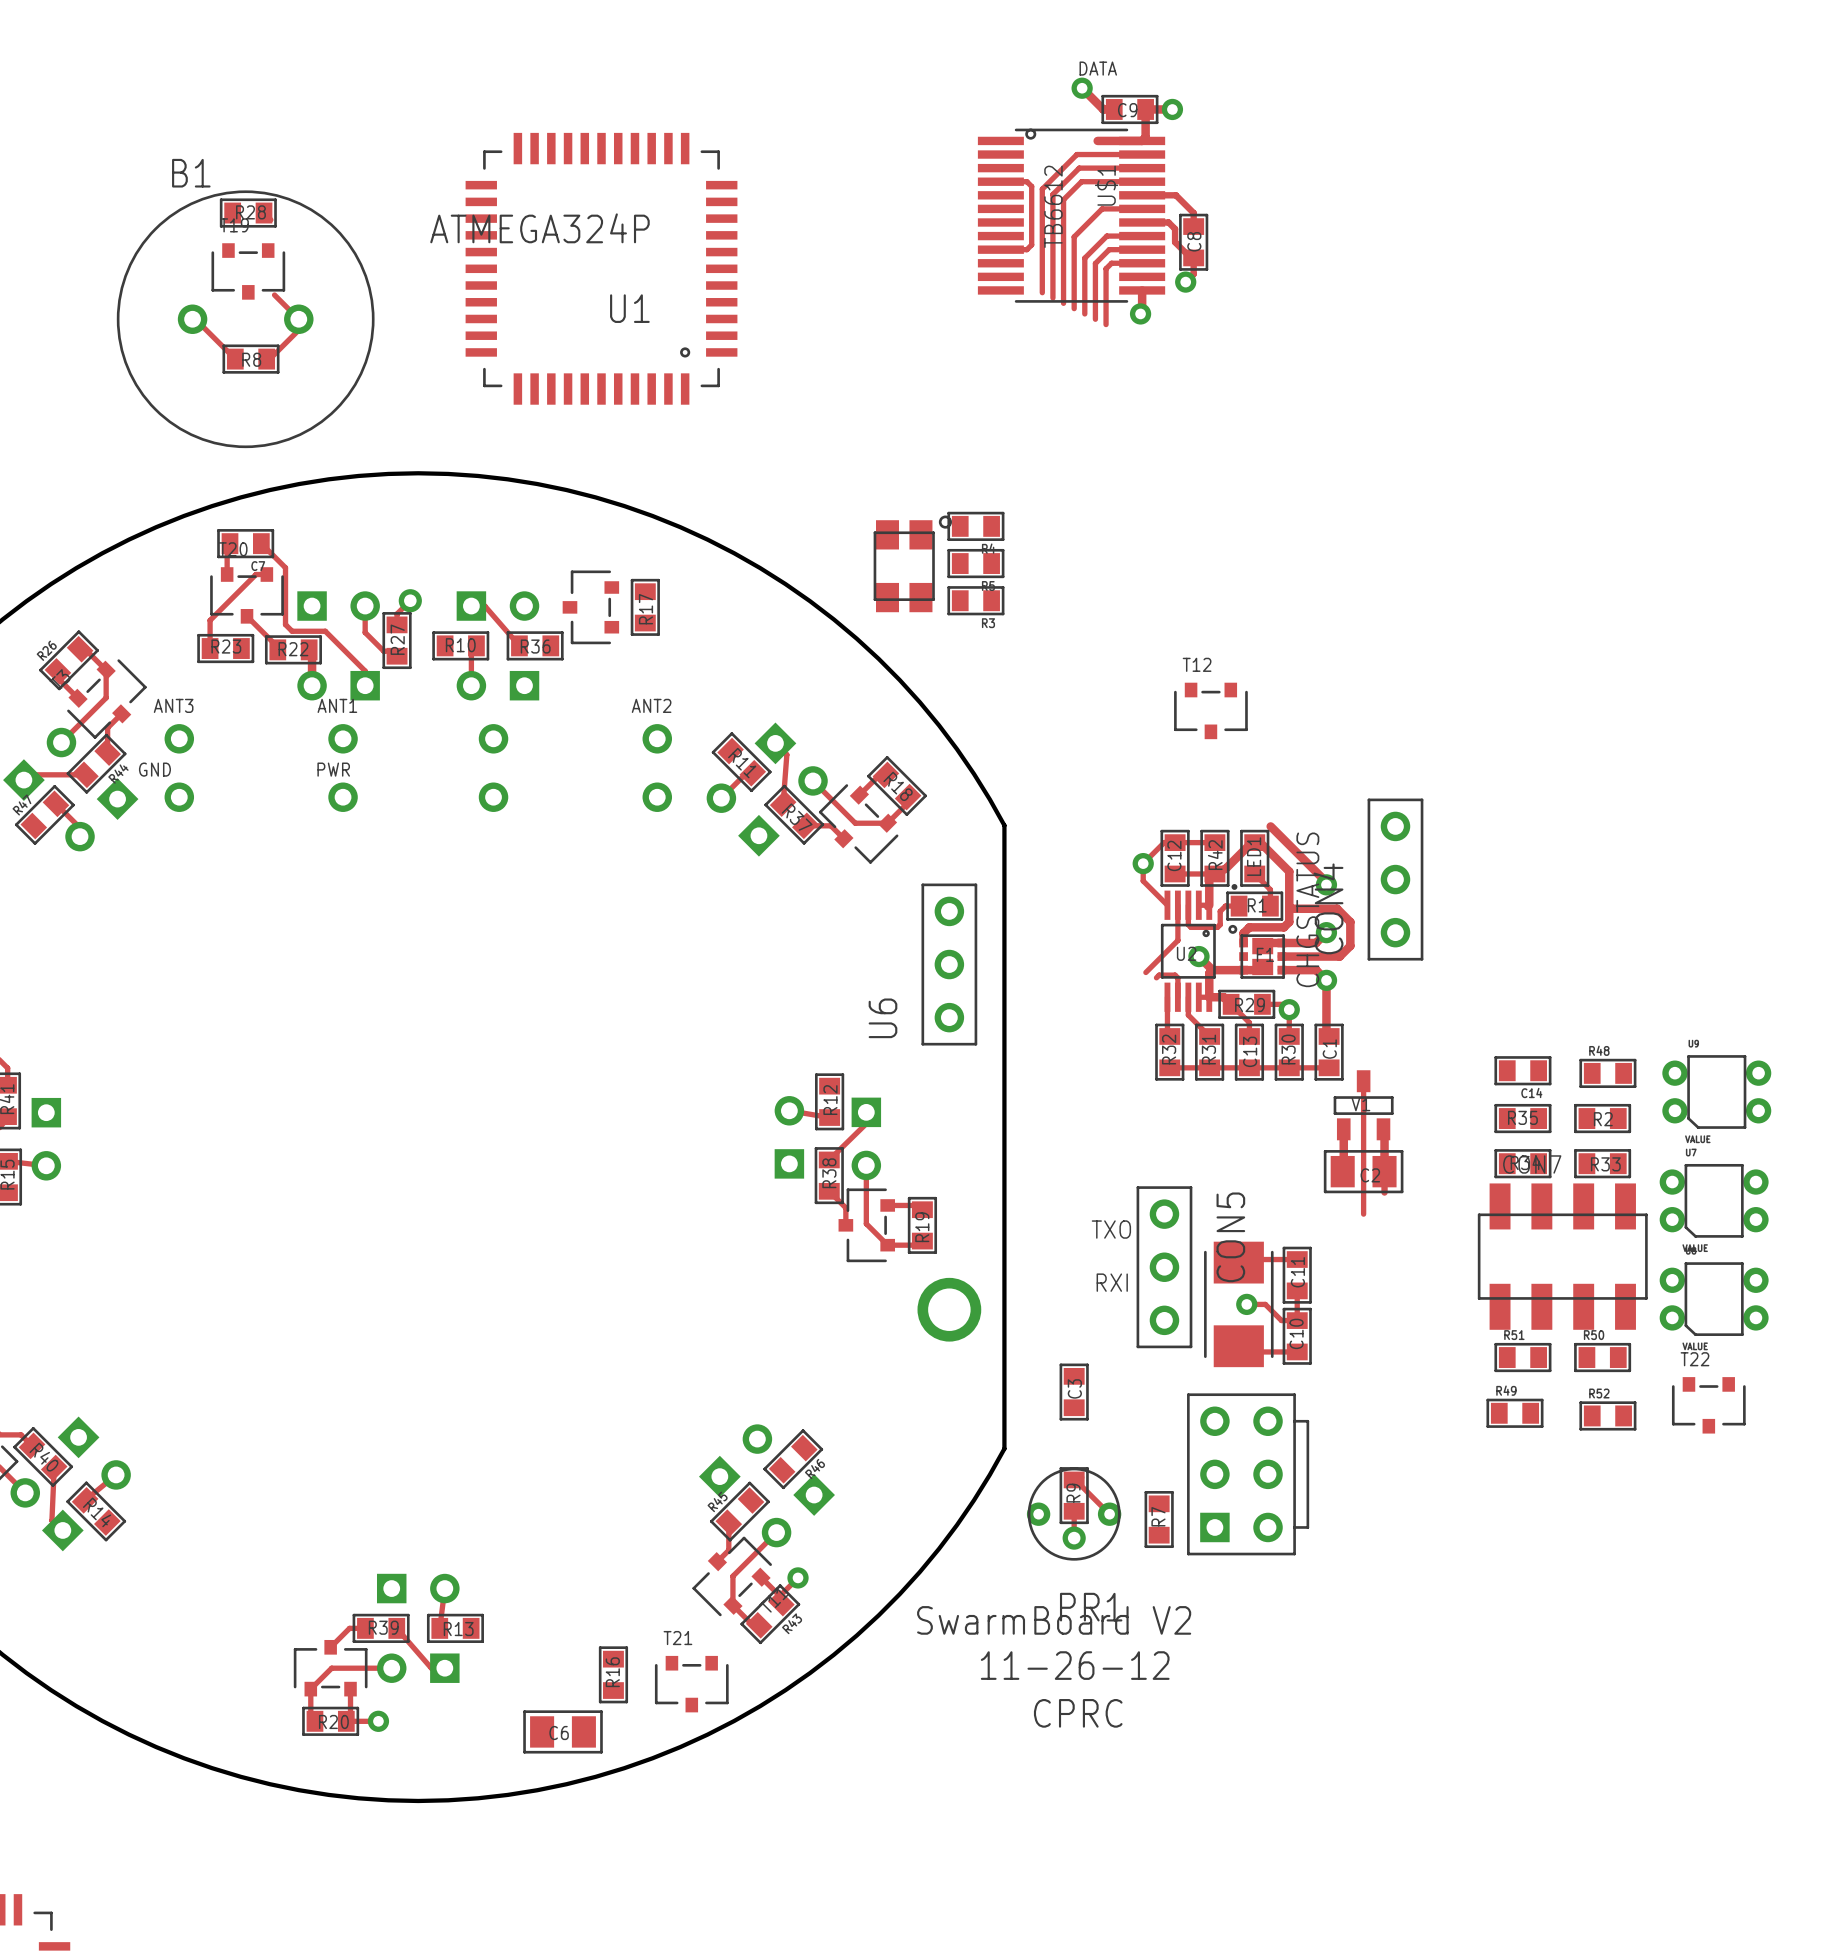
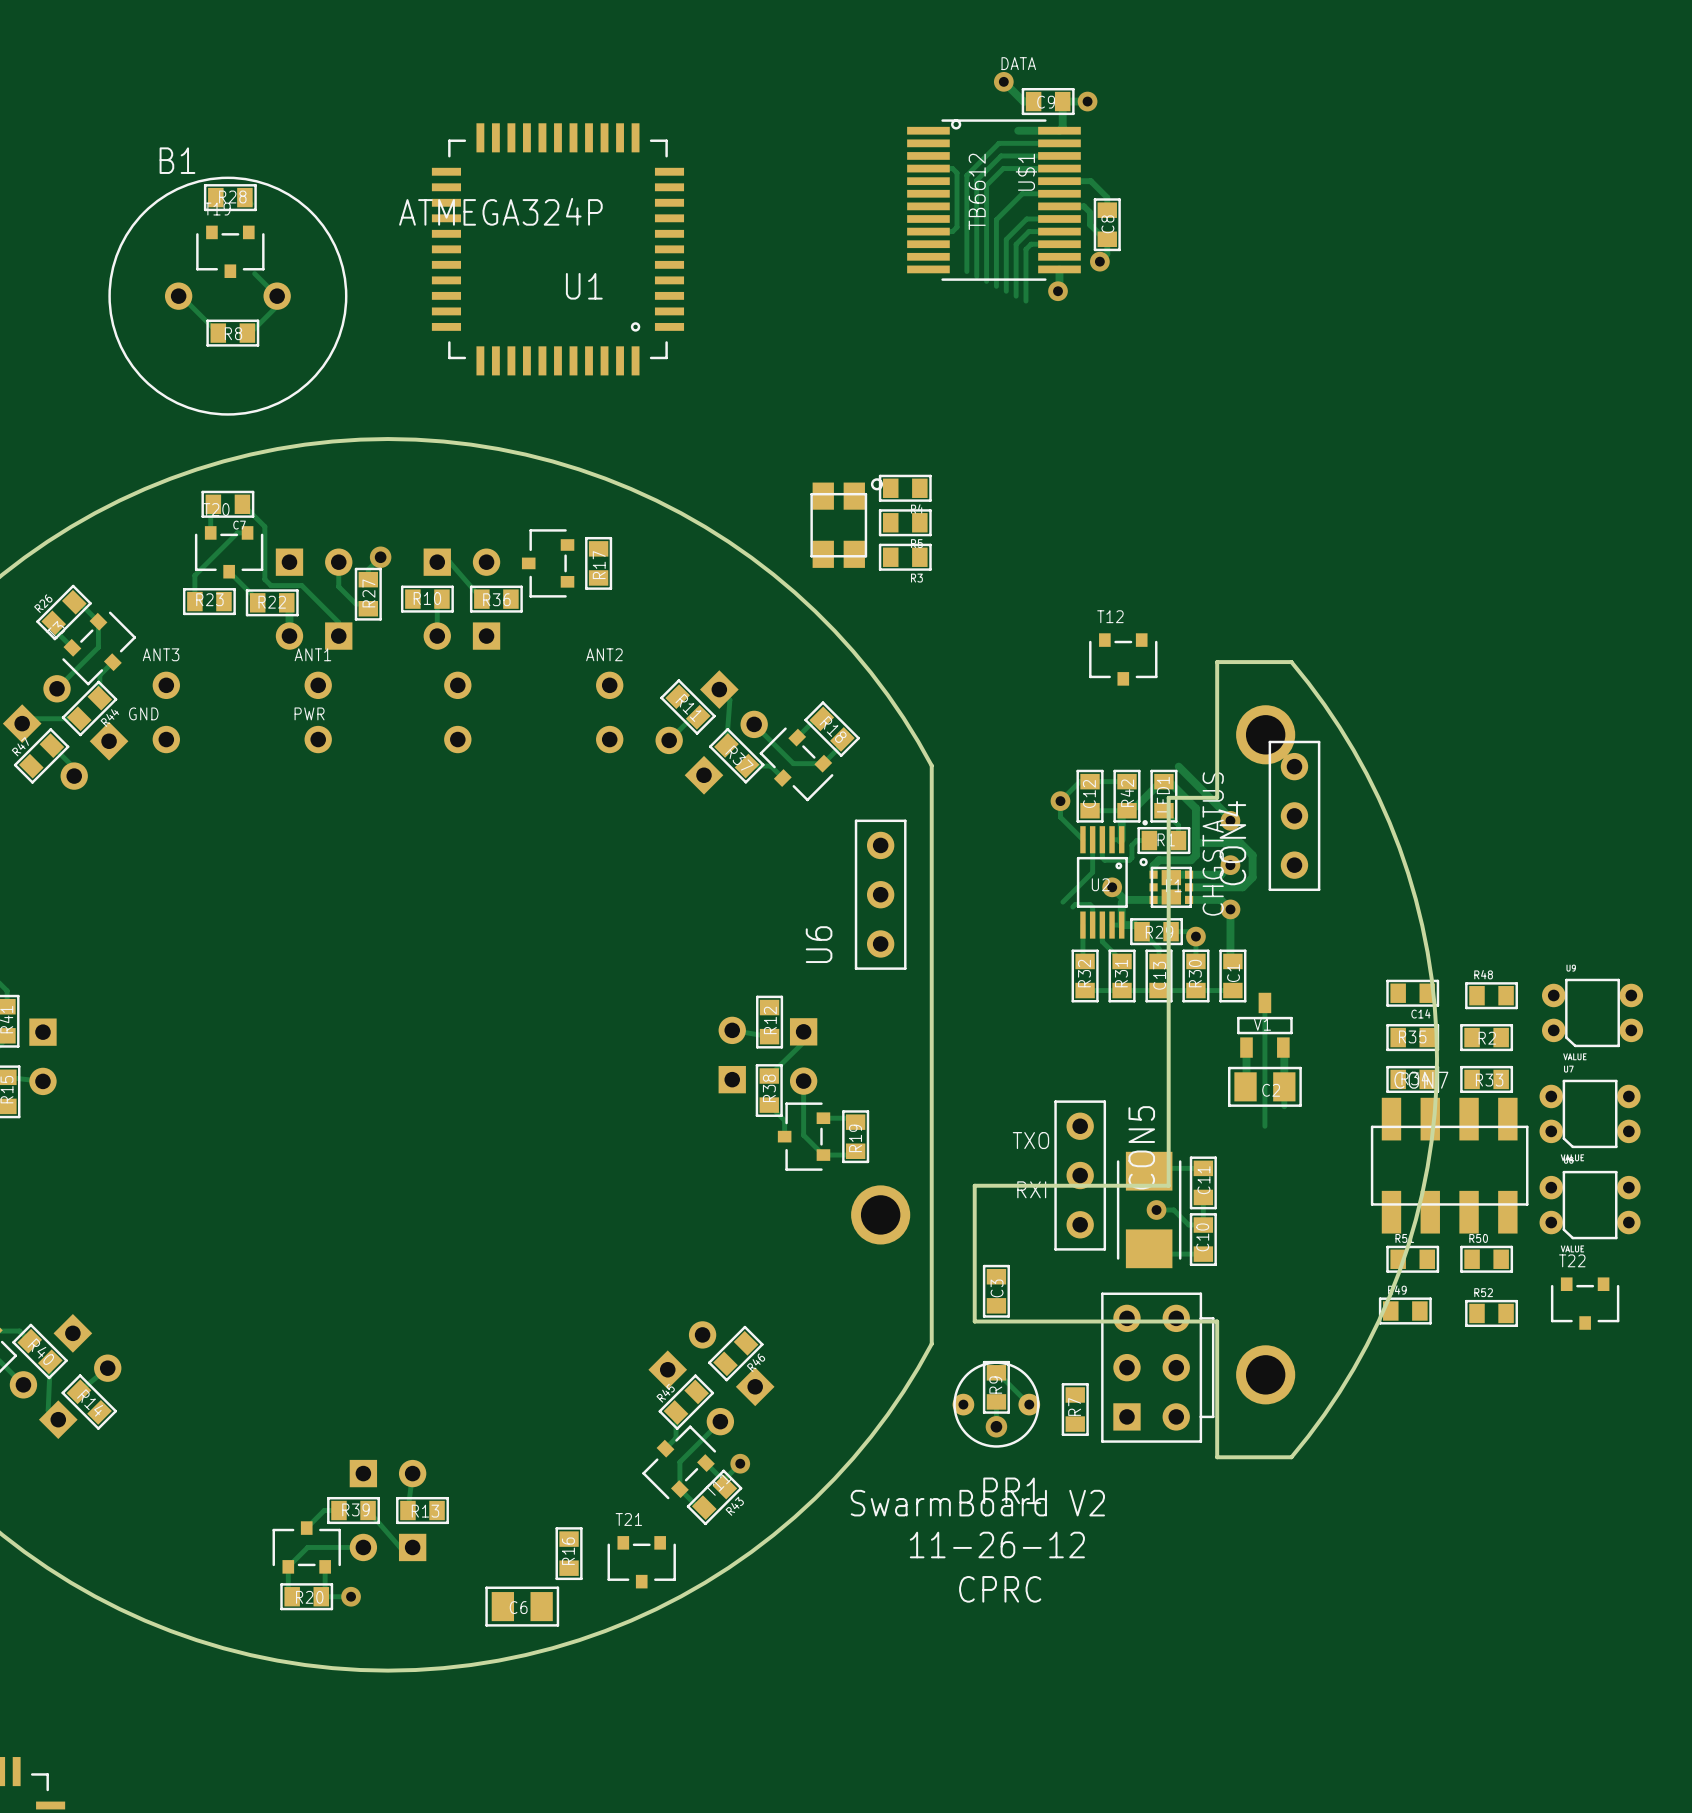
board edge: none -> (1217, 662) (1217, 797) (1168, 797) (1168, 1185) (974, 1185) (974, 1321) (1217, 1321) (1217, 1457) (1291, 1457) (1324, 1414) (1366, 1345) (1389, 1296) (1408, 1245) (1422, 1193) (1434, 1113) (1437, 1059) (1434, 1005) (1422, 925) (1399, 847) (1366, 773) (1339, 727) (1291, 662) (1217, 662)
part: none -> (1265, 734)
part: none -> (1265, 1374)

